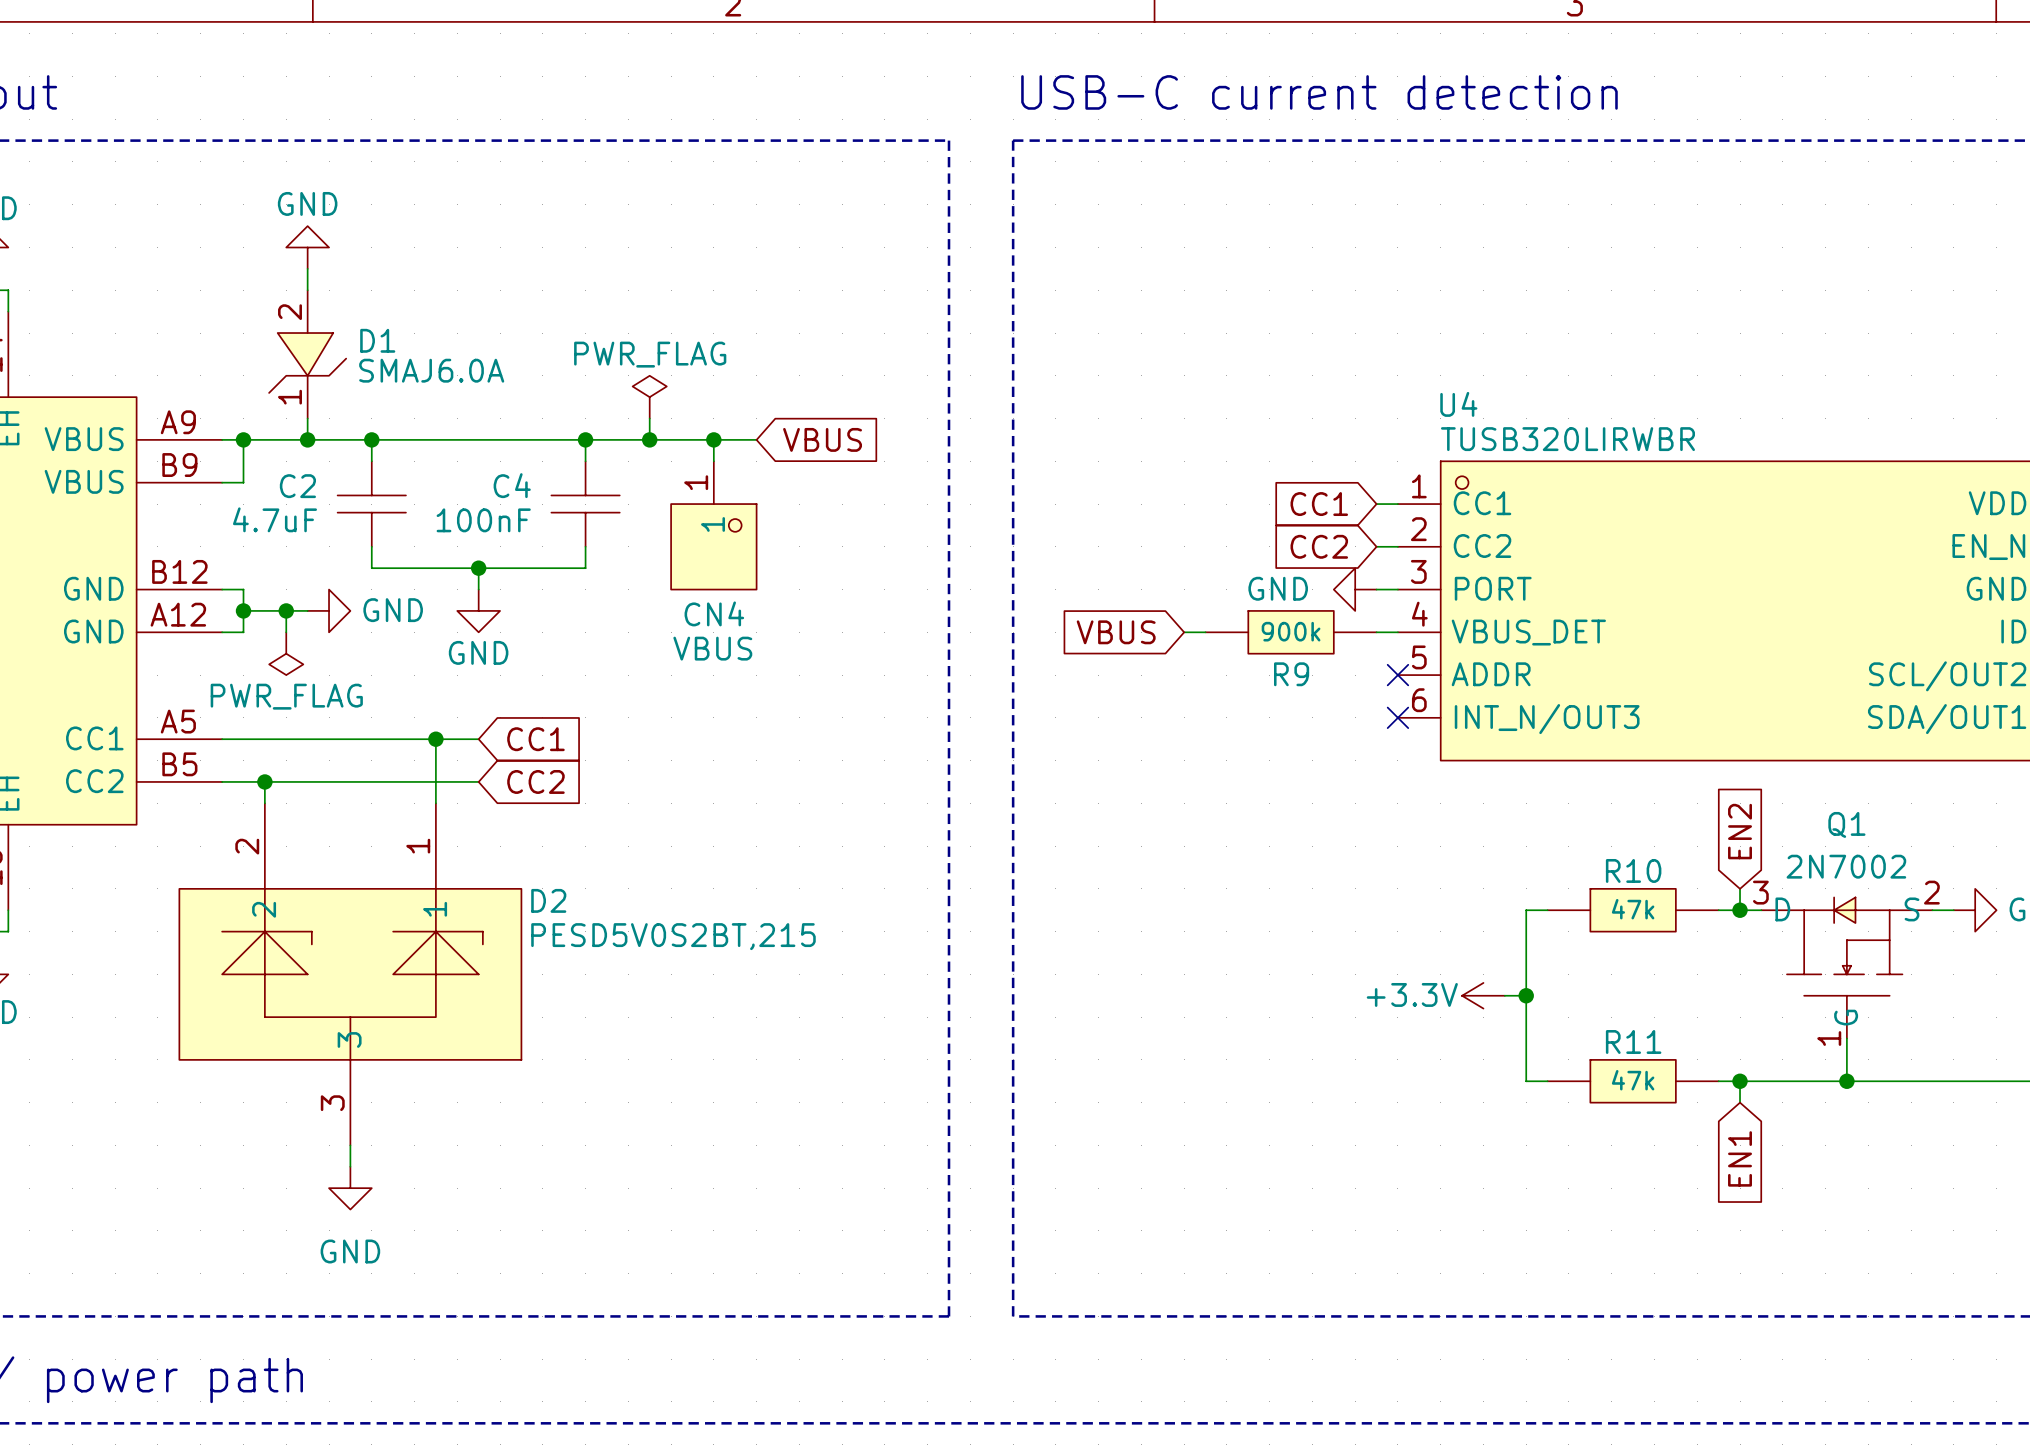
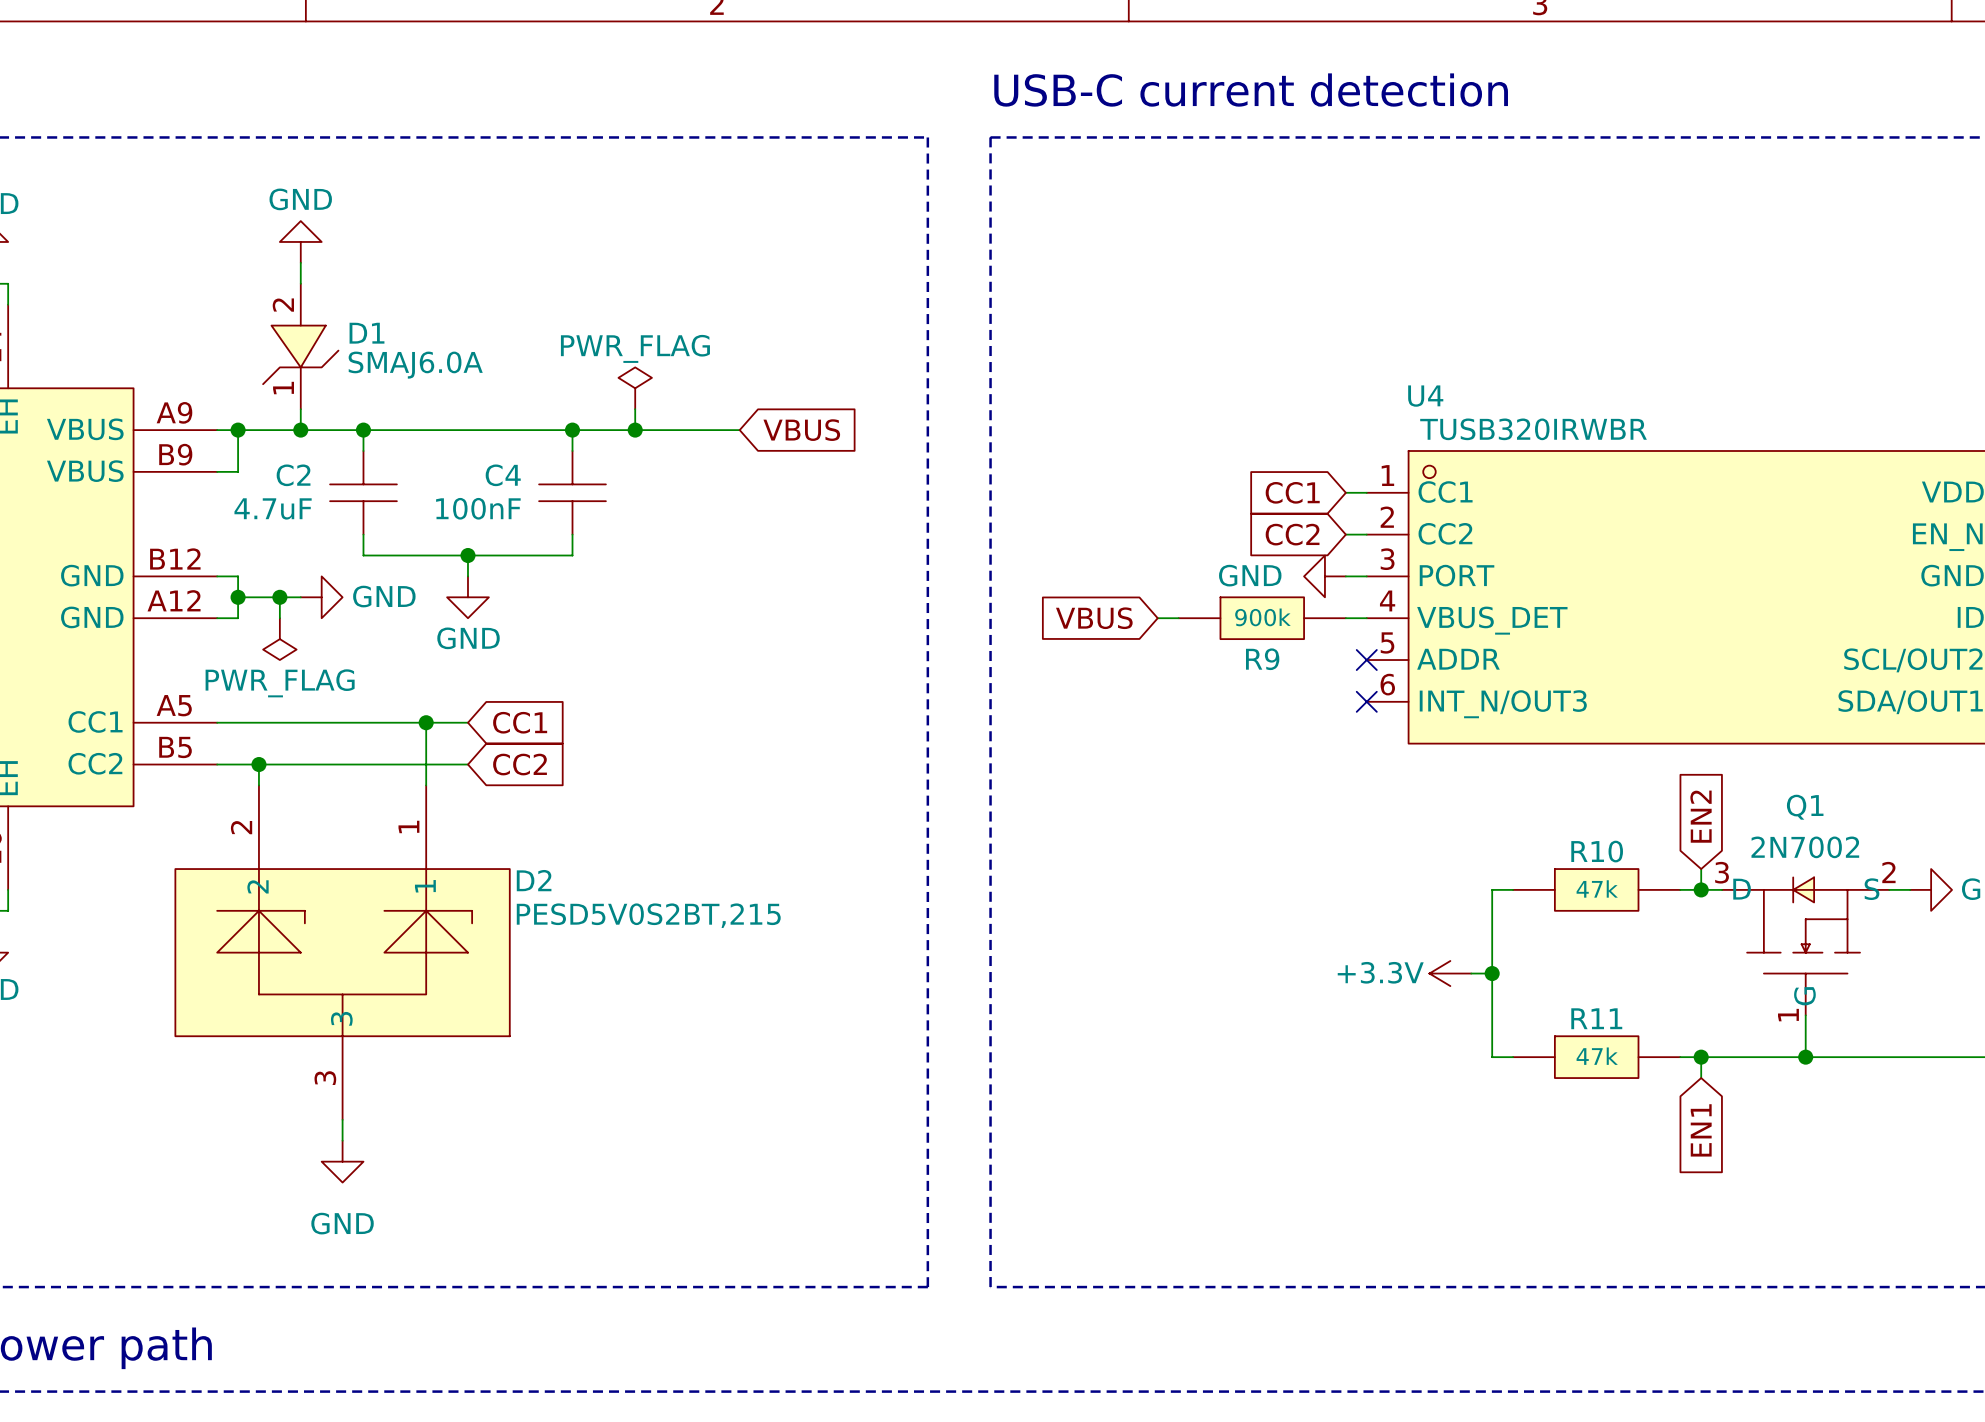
wire: (713, 439) (713, 461) -> none
junction: (713, 439) -> none
U4 value: TUSB320LIRWBR (1567, 439) -> TUSB320IRWBR (1533, 429)
CN4: VBUS (713, 525) -> none

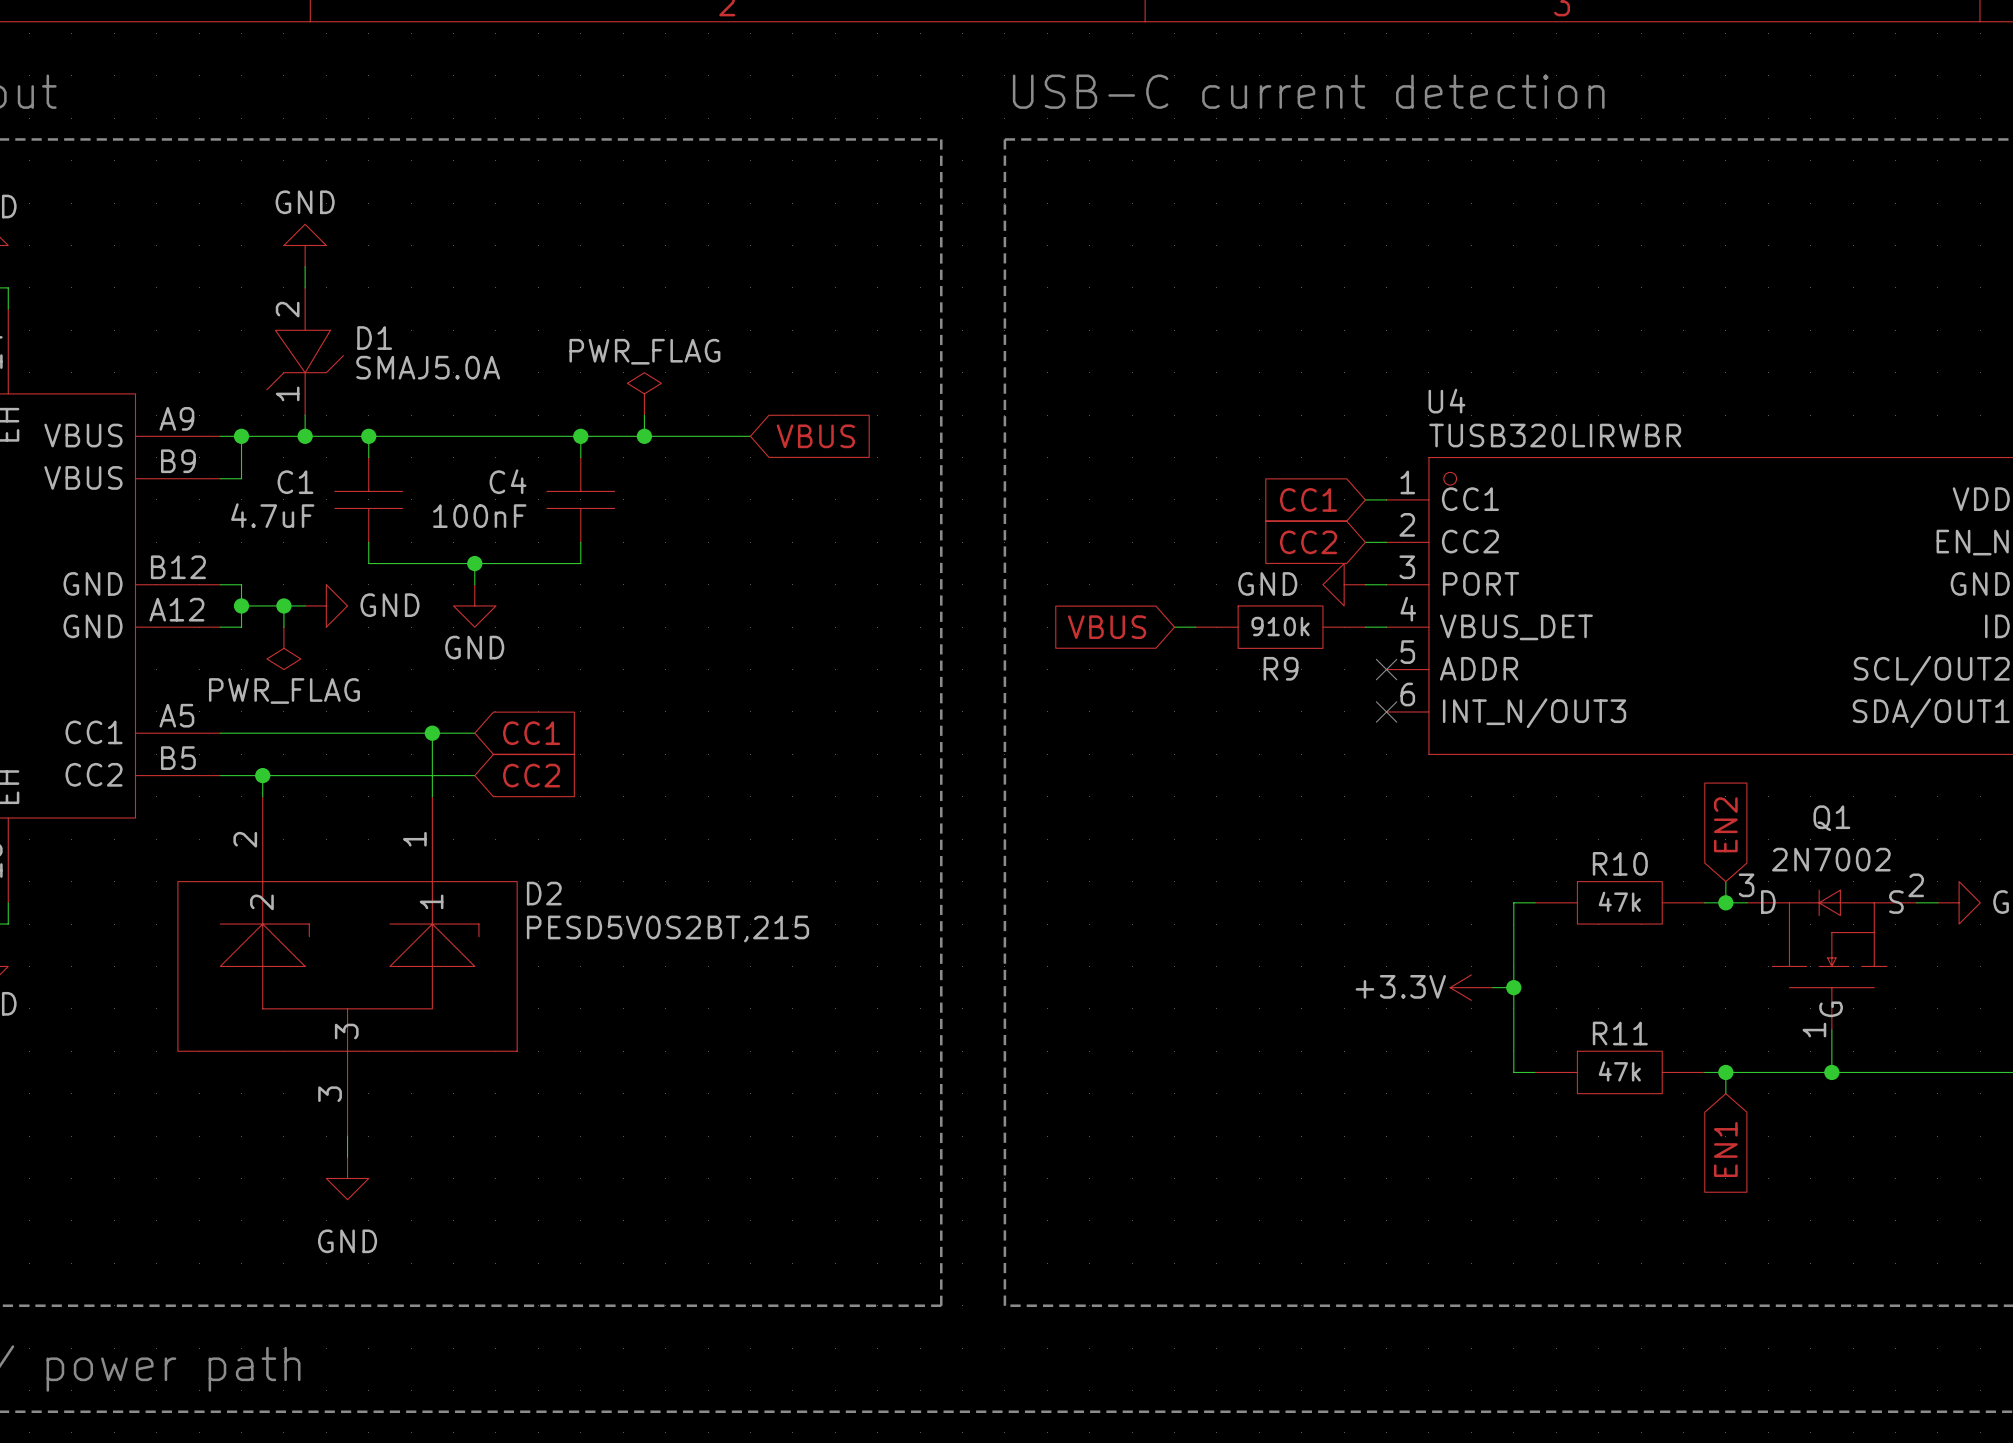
D1 value: SMAJ6.0A (415, 365) -> SMAJ5.0A (428, 367)
U4 value: TUSB320IRWBR (1533, 429) -> TUSB320LIRWBR (1555, 435)
C2 name: C2 (293, 475) -> C1 (295, 482)
R9 value: 900k (1262, 617) -> 910k (1280, 626)

